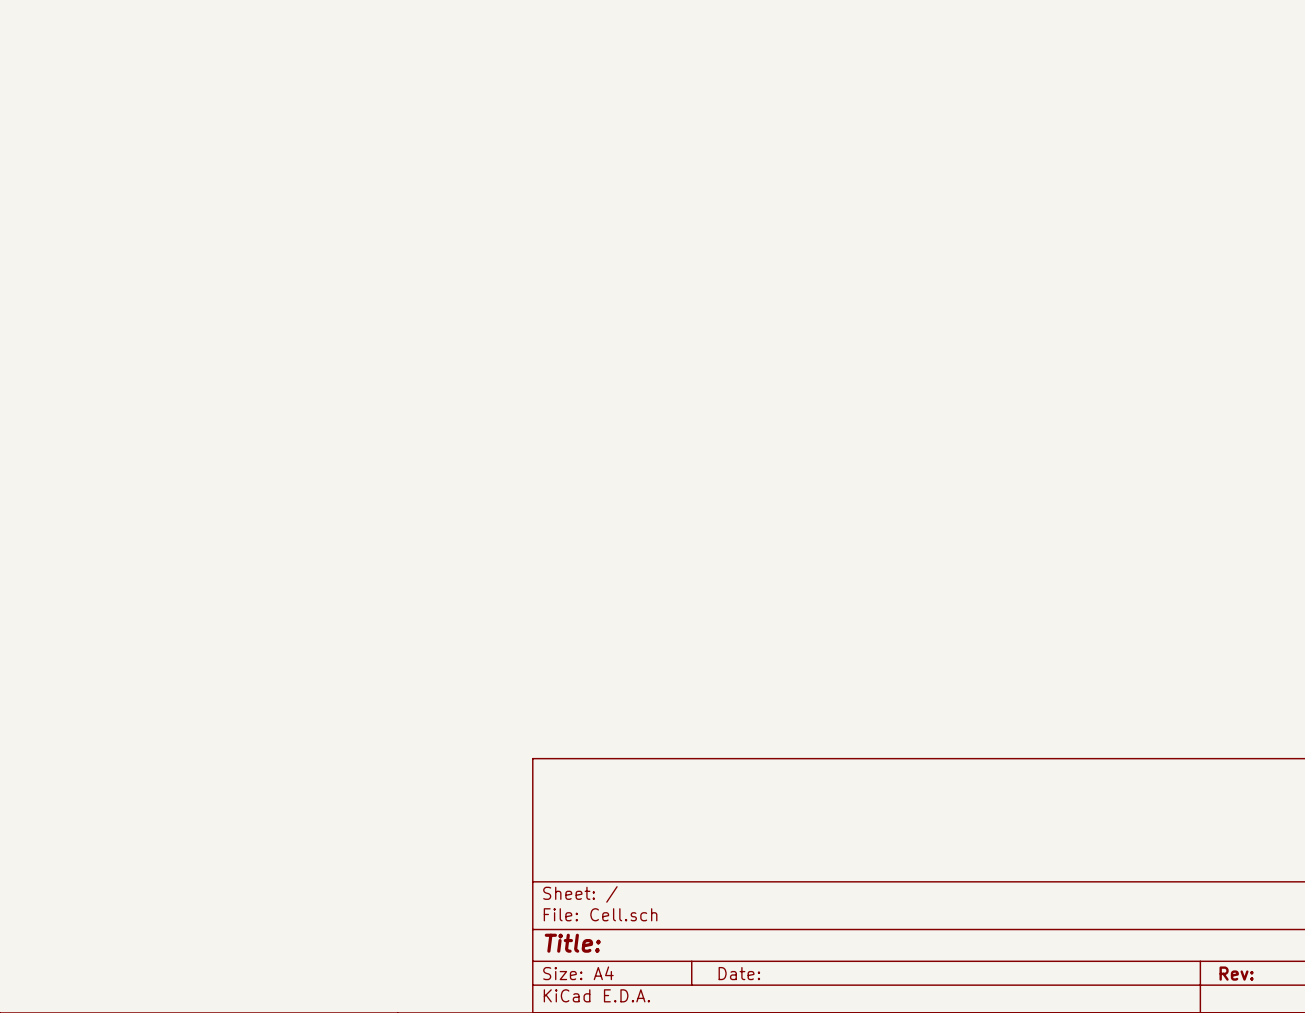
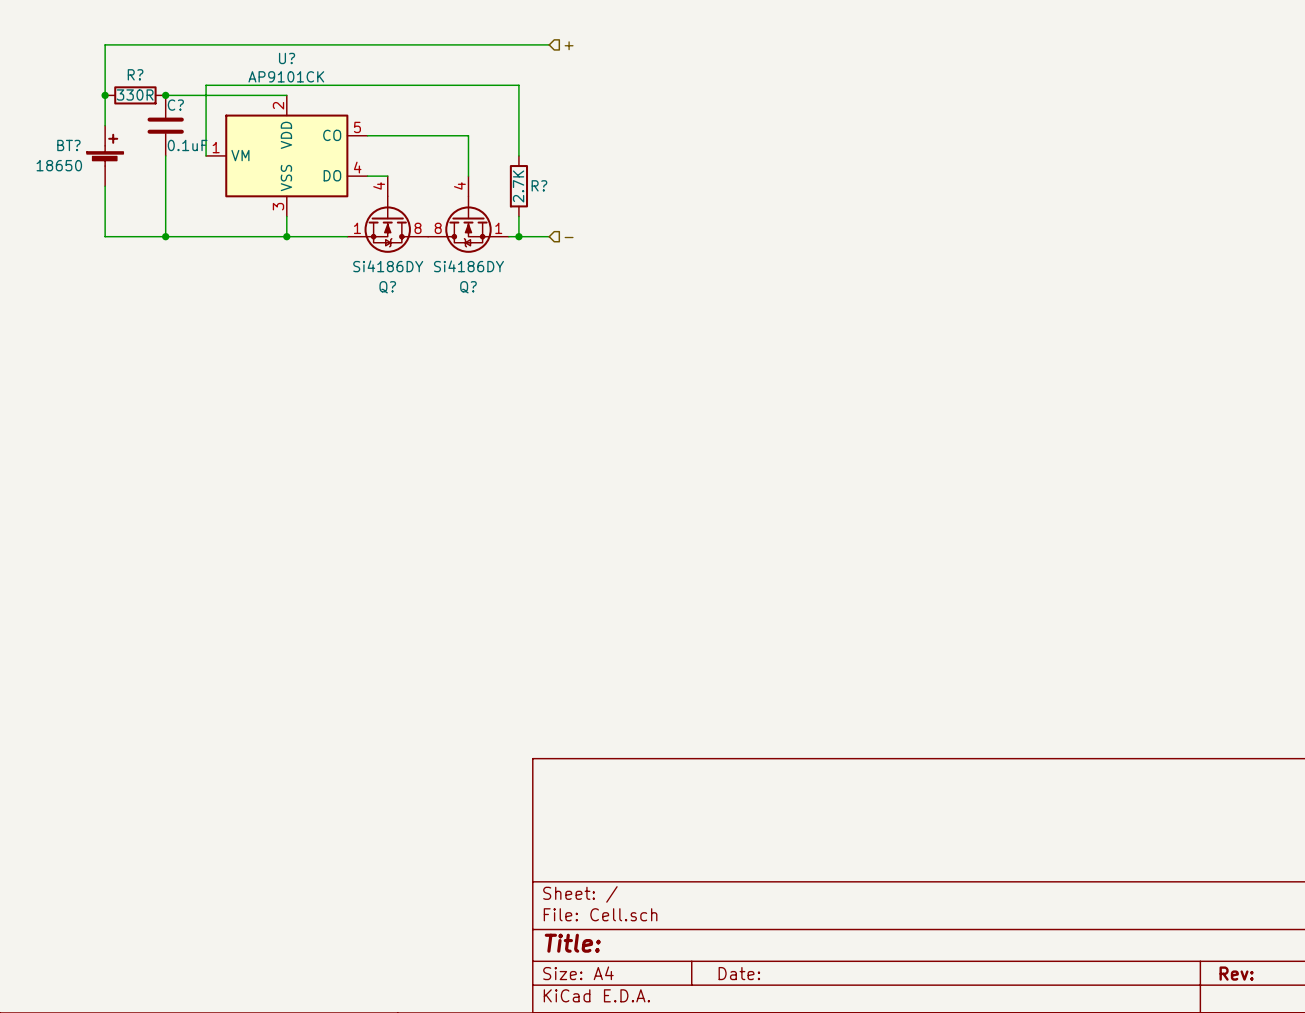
wire: none -> (549, 44) (105, 44) (105, 125)
hierarchical label: none -> + (569, 45)
junction: none -> (105, 95)
R?: none -> 330R (135, 95)
wire: none -> (165, 95) (286, 95)
junction: none -> (165, 95)
C?: none -> 0.1uF (165, 125)
wire: none -> (367, 135) (468, 135) (468, 176)
BT?: none -> 18650 (105, 155)
wire: none -> (165, 155) (165, 236)
wire: none -> (206, 155) (206, 85) (518, 85) (518, 155)
U?: none -> AP9101CK (286, 155)
wire: none -> (367, 176) (387, 176)
wire: none -> (105, 186) (105, 236) (347, 236)
R?: none -> 2.7K (518, 186)
Q?: none -> Si4186DY (387, 214)
Q?: none -> Si4186DY (468, 214)
wire: none -> (286, 216) (286, 236)
wire: none -> (518, 216) (518, 236)
junction: none -> (165, 236)
junction: none -> (286, 236)
wire: none -> (508, 236) (549, 236)
junction: none -> (518, 236)
hierarchical label: none -> - (569, 237)

